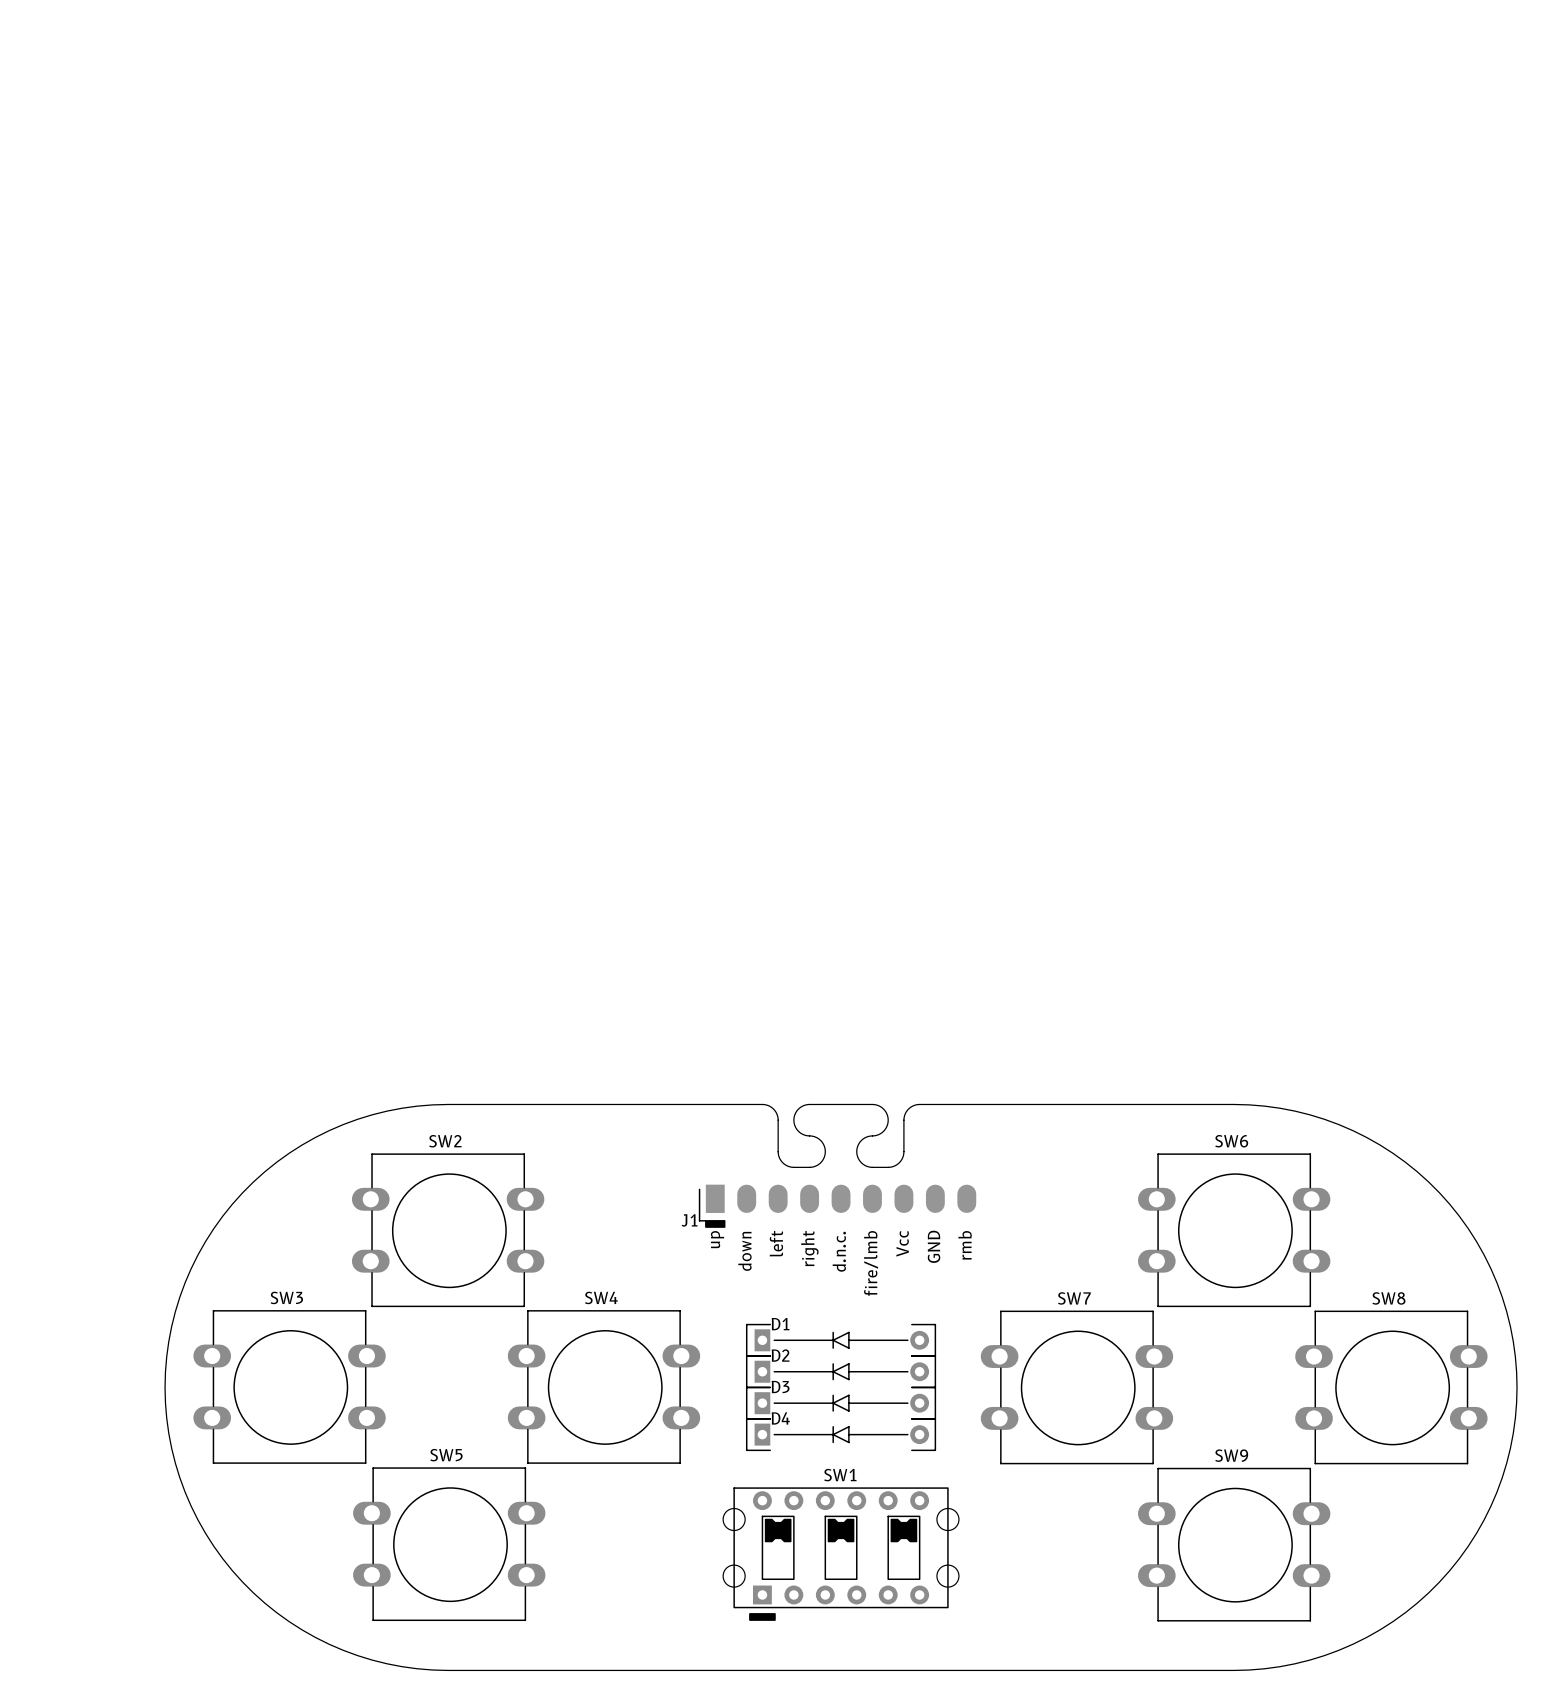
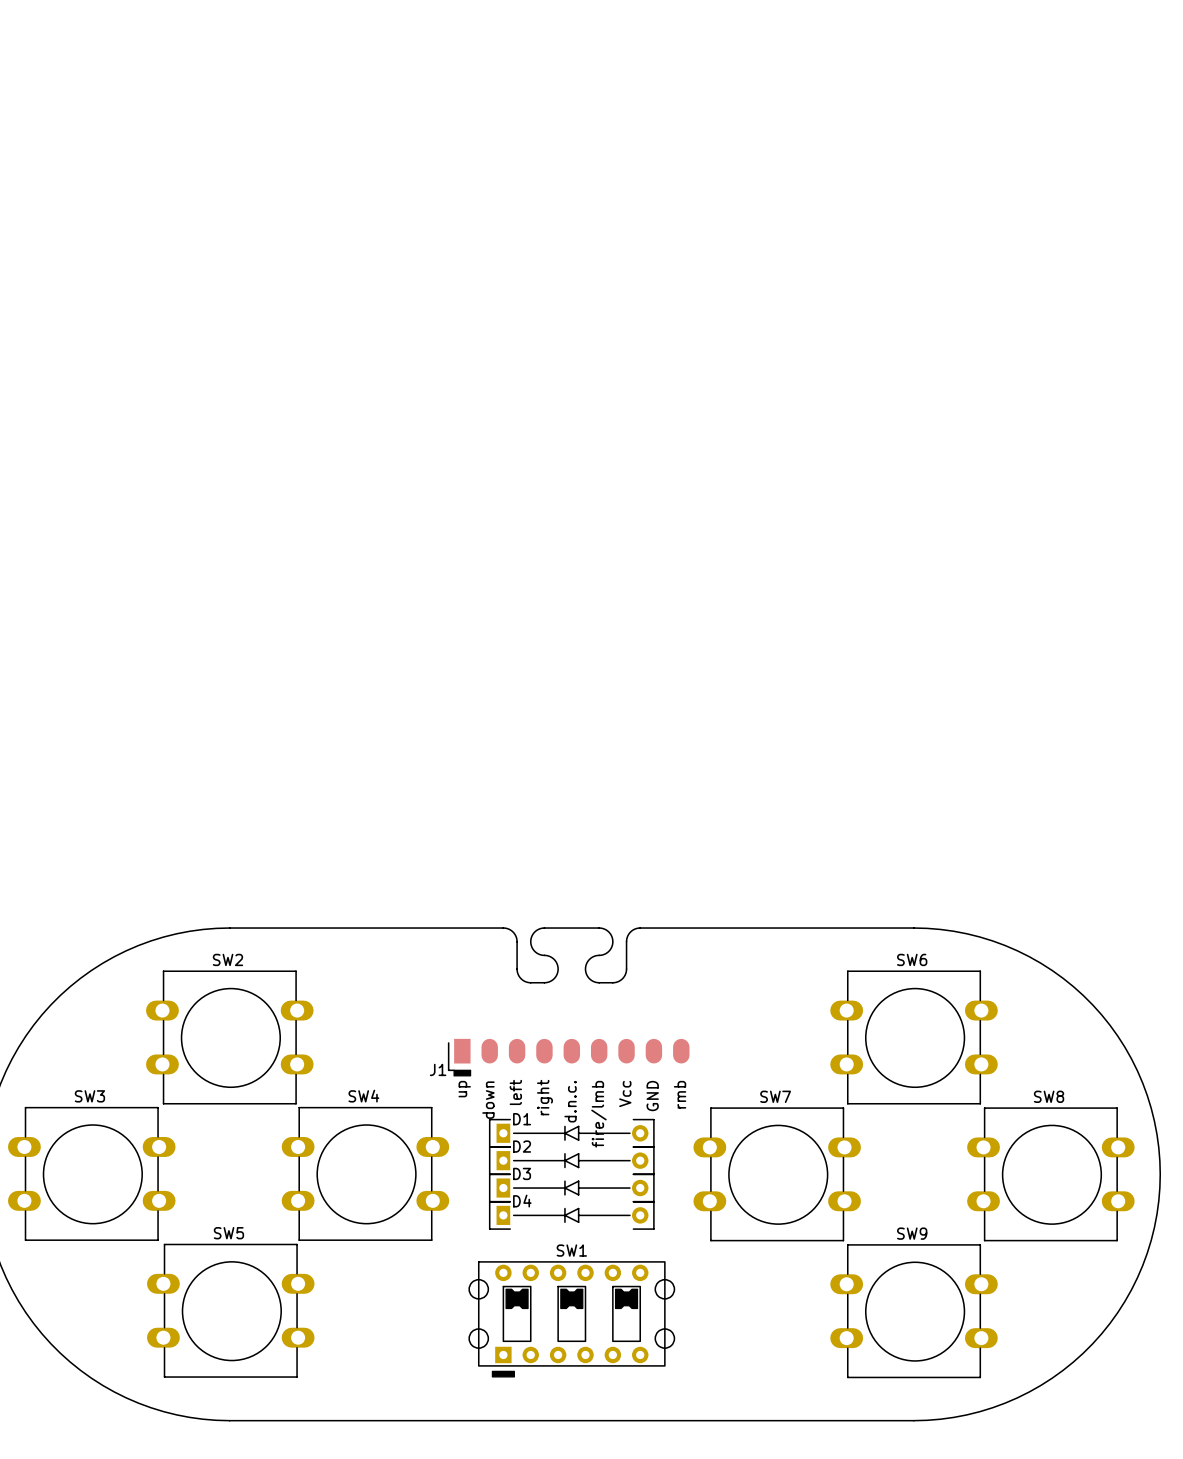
J1 position: (837, 1206) -> (568, 1057)

